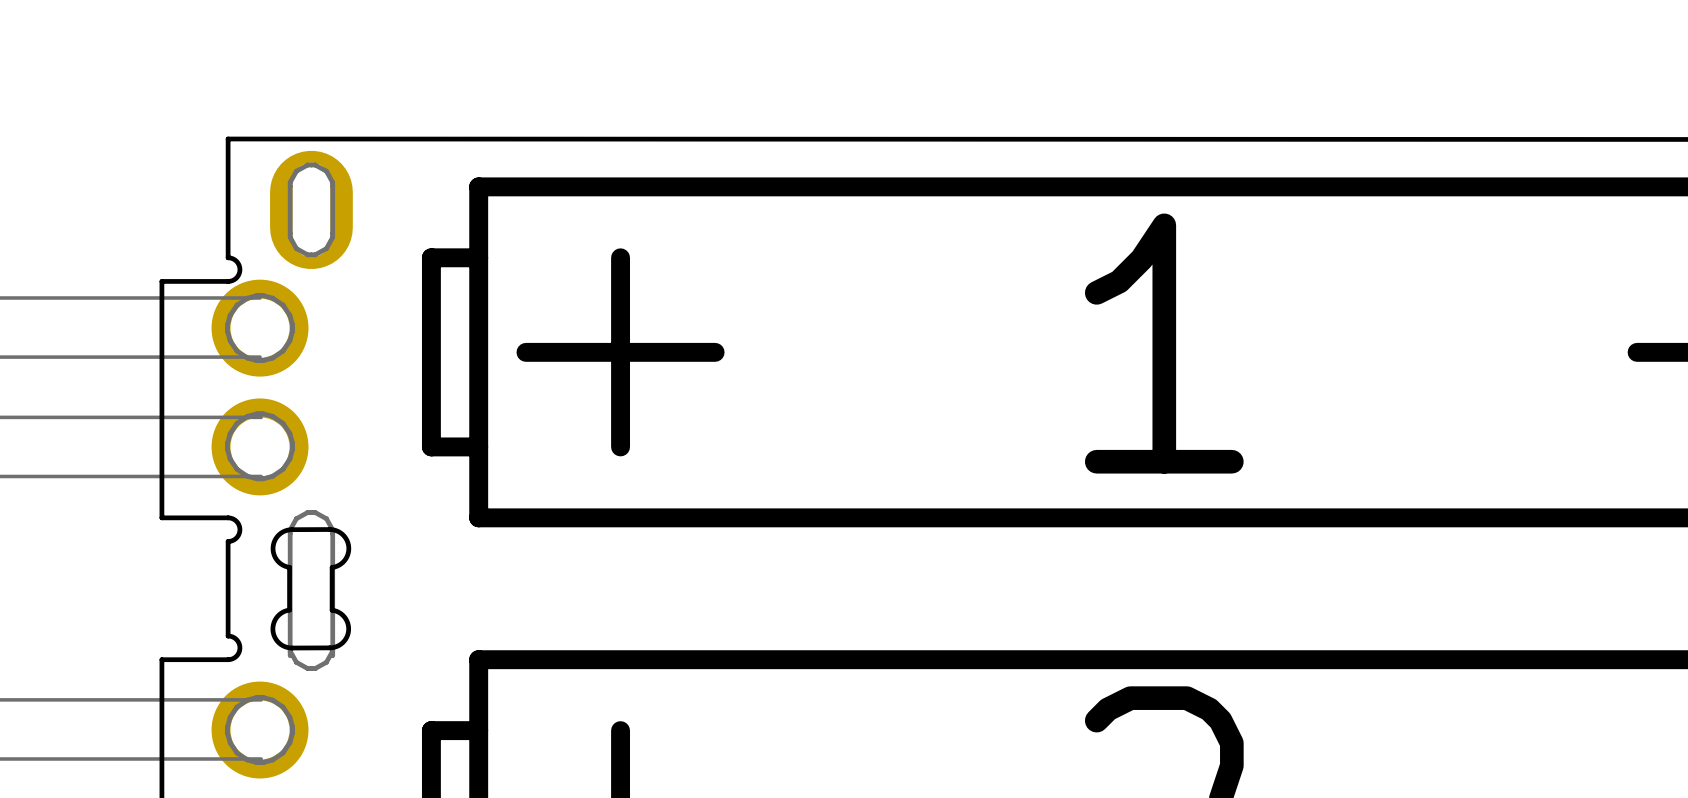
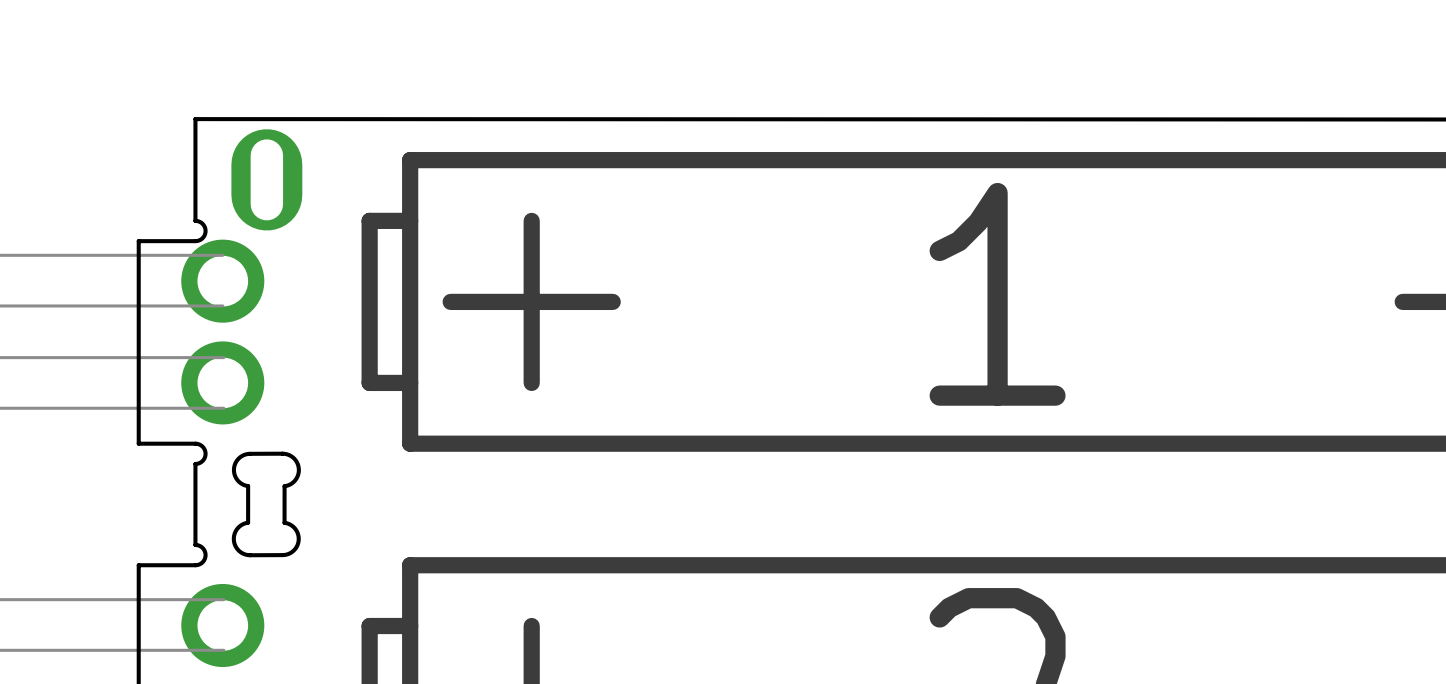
line: (307, 164) (296, 171) (290, 182) (290, 237) (296, 248) (307, 254) (315, 254) (326, 248) (332, 237) (332, 182) (326, 171) (315, 164) (307, 164) -> none
line: (256, 295) (272, 298) (283, 305) (289, 315) (292, 324) (289, 340) (283, 351) (272, 358) (263, 360) (247, 358) (237, 351) (230, 340) (227, 331) (230, 315) (237, 305) (247, 298) (256, 295) -> none
line: (256, 413) (272, 416) (283, 423) (289, 433) (292, 443) (289, 458) (283, 469) (272, 476) (263, 478) (247, 476) (237, 469) (230, 458) (227, 449) (230, 433) (237, 423) (247, 416) (256, 413) -> none
line: (290, 651) (296, 662) (307, 668) (315, 668) (326, 662) (332, 651) -> none
line: (290, 655) (290, 530) (296, 518) (307, 512) (315, 512) (326, 518) (332, 530) (332, 655) -> none
line: (256, 697) (272, 700) (283, 707) (289, 717) (292, 726) (289, 742) (283, 753) (272, 759) (263, 762) (247, 759) (237, 753) (230, 742) (227, 733) (230, 717) (237, 707) (247, 700) (256, 697) -> none

